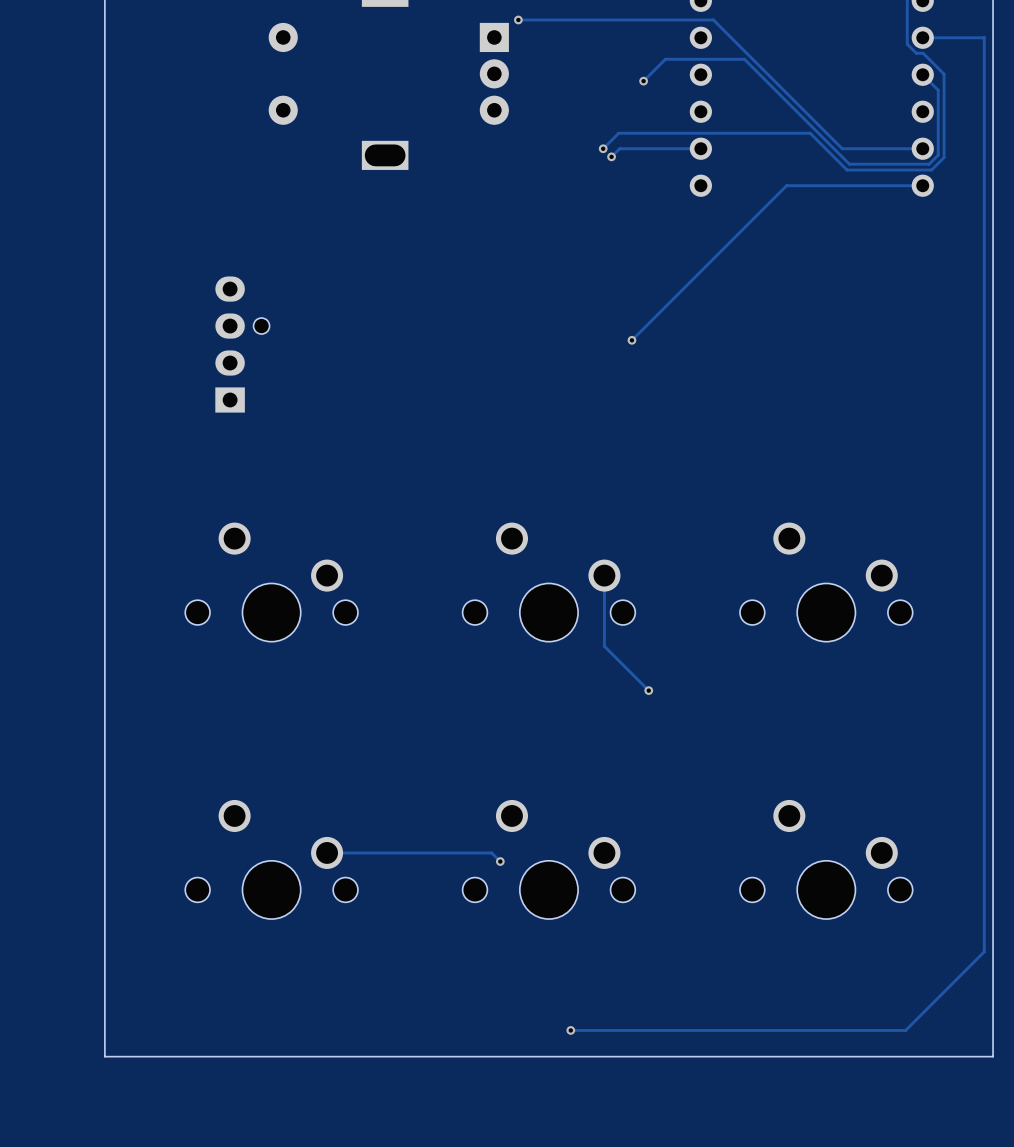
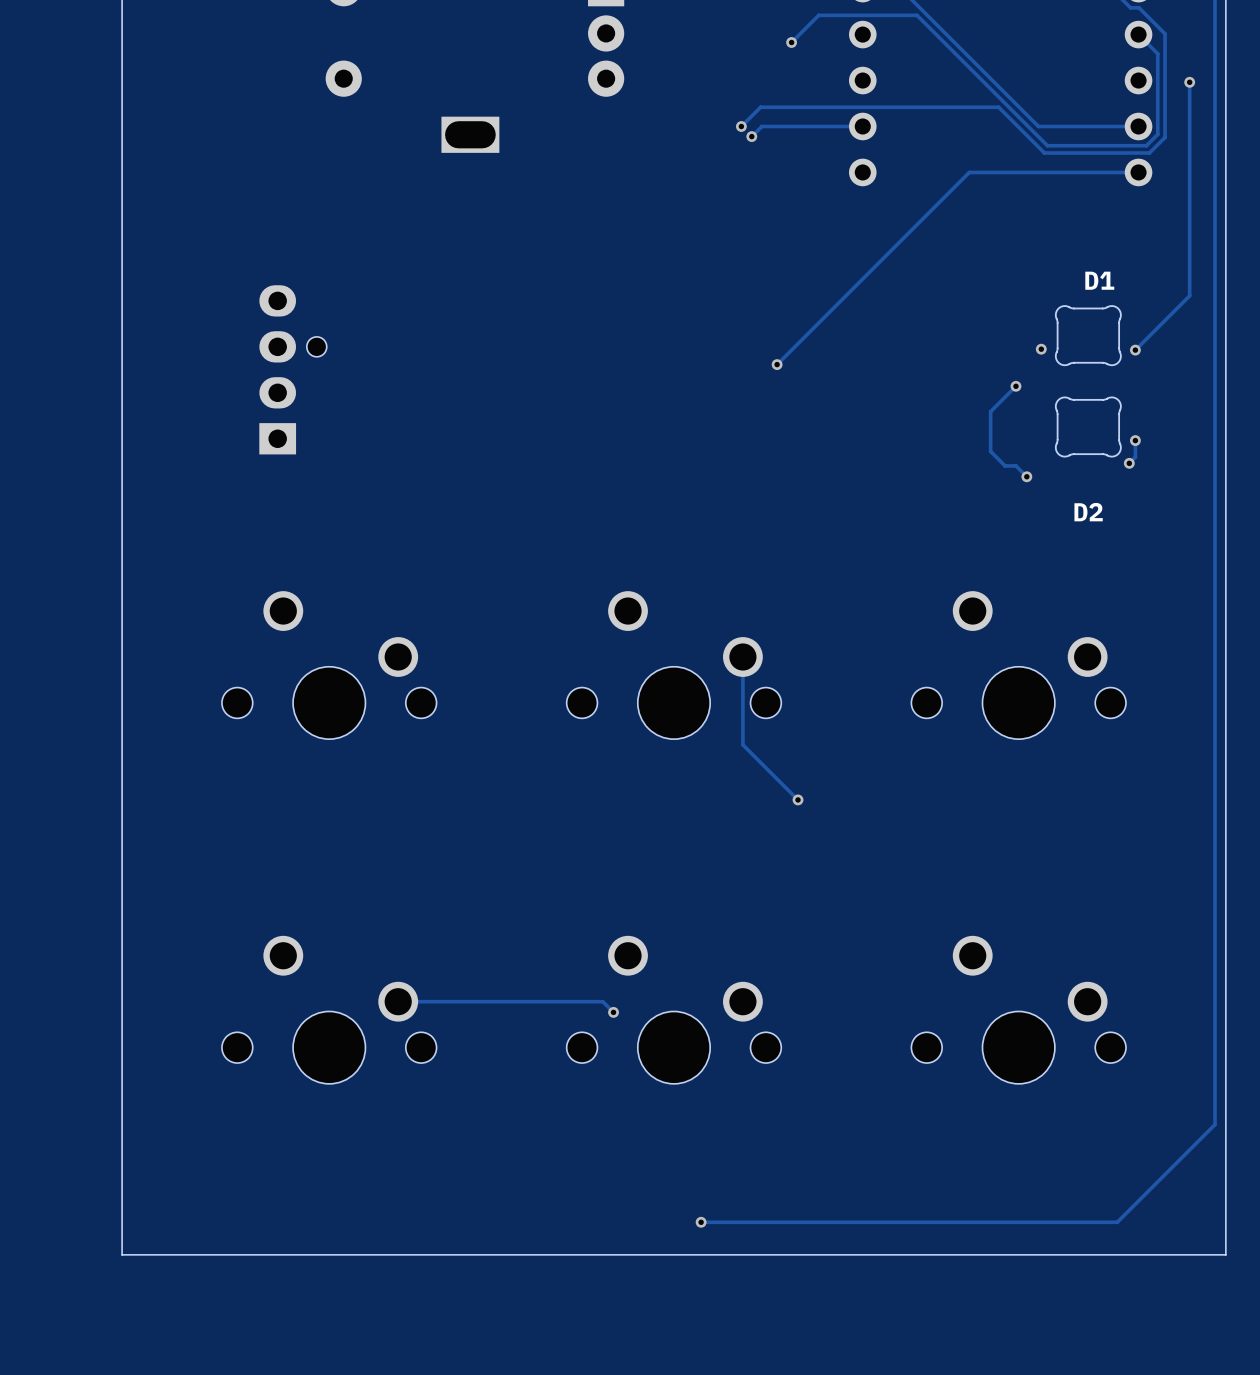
track: none -> (1189, 82) (1189, 295) (1135, 350)
via: none -> (1189, 82)
D1: none -> (1088, 335)
via: none -> (1041, 349)
via: none -> (1135, 350)
track: none -> (1015, 386) (990, 411) (990, 451) (1005, 465) (1015, 465) (1026, 476)
via: none -> (1015, 386)
D2: none -> (1088, 427)
track: none -> (1135, 440) (1135, 457) (1129, 463)
via: none -> (1135, 440)
via: none -> (1129, 463)
via: none -> (1026, 476)

